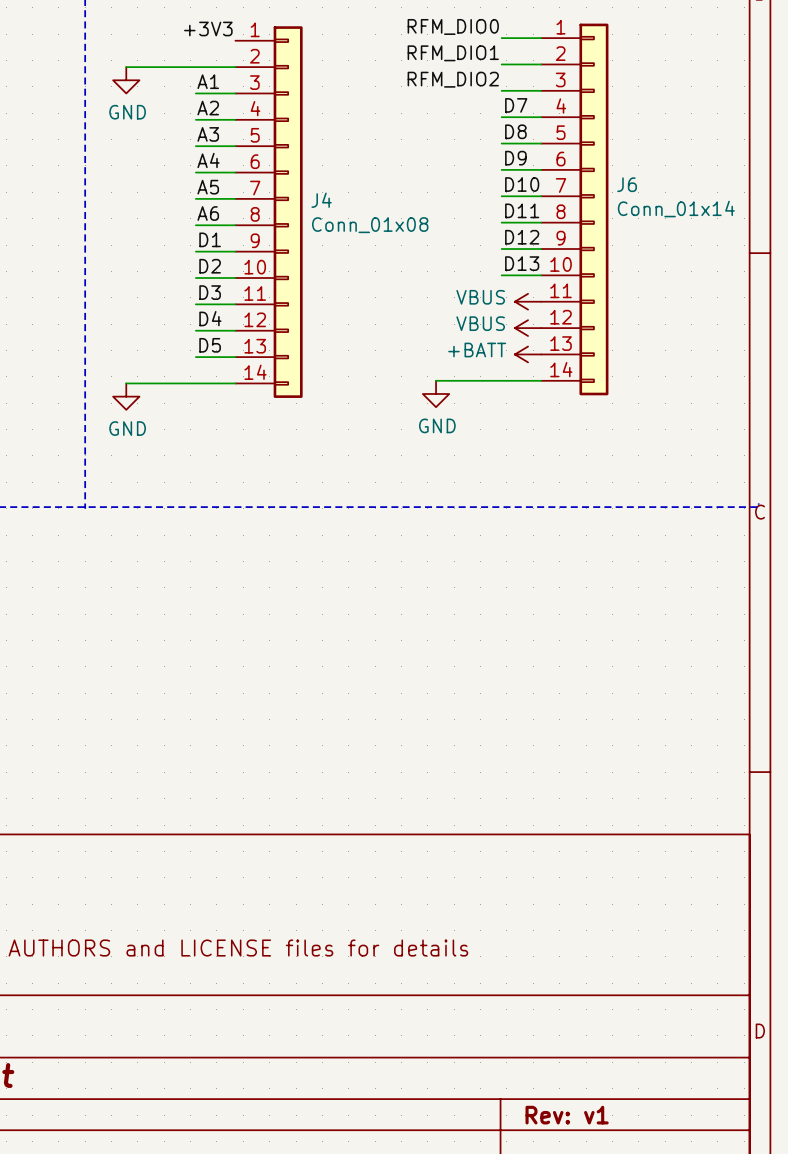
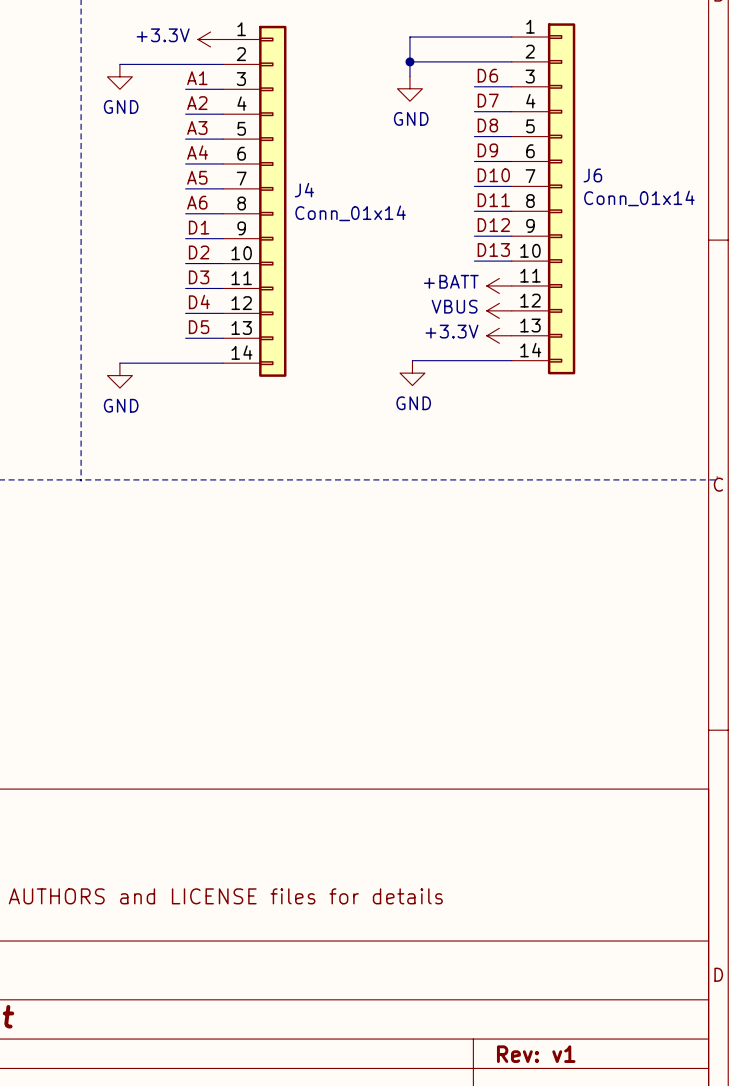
label: RFM_DIO0 (453, 26) -> none
label: +3V3 (208, 28) -> none
wire: none -> (474, 37) (409, 37) (409, 76)
power symbol: none -> +3.3V (210, 39)
label: RFM_DIO1 (453, 53) -> none
wire: none -> (409, 61) (474, 61)
junction: none -> (409, 61)
label: RFM_DIO2 (453, 79) -> D6 (487, 75)
power symbol: none -> GND (409, 88)
J4 value: Conn_01x08 (370, 225) -> Conn_01x14 (350, 213)
power symbol: VBUS (528, 301) -> +BATT (499, 285)
power symbol: +BATT (528, 354) -> +3.3V (499, 335)

